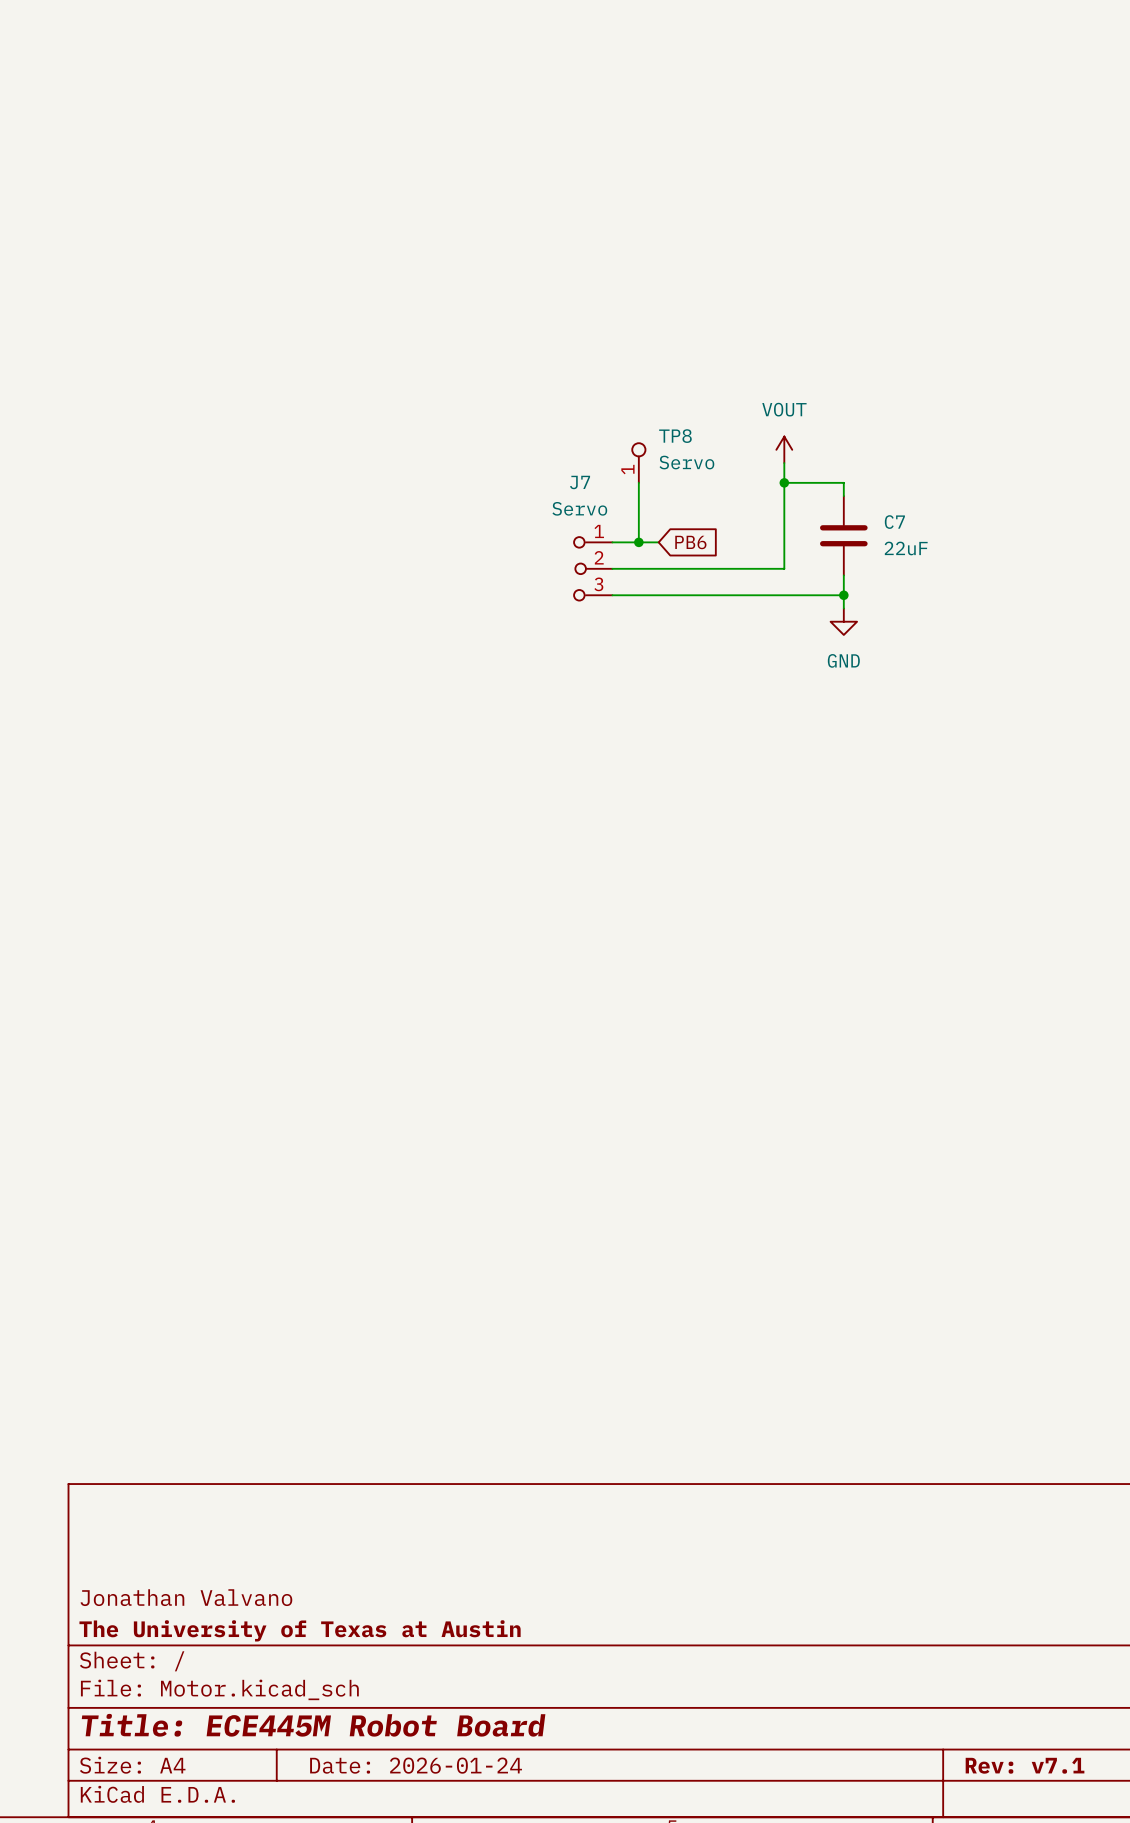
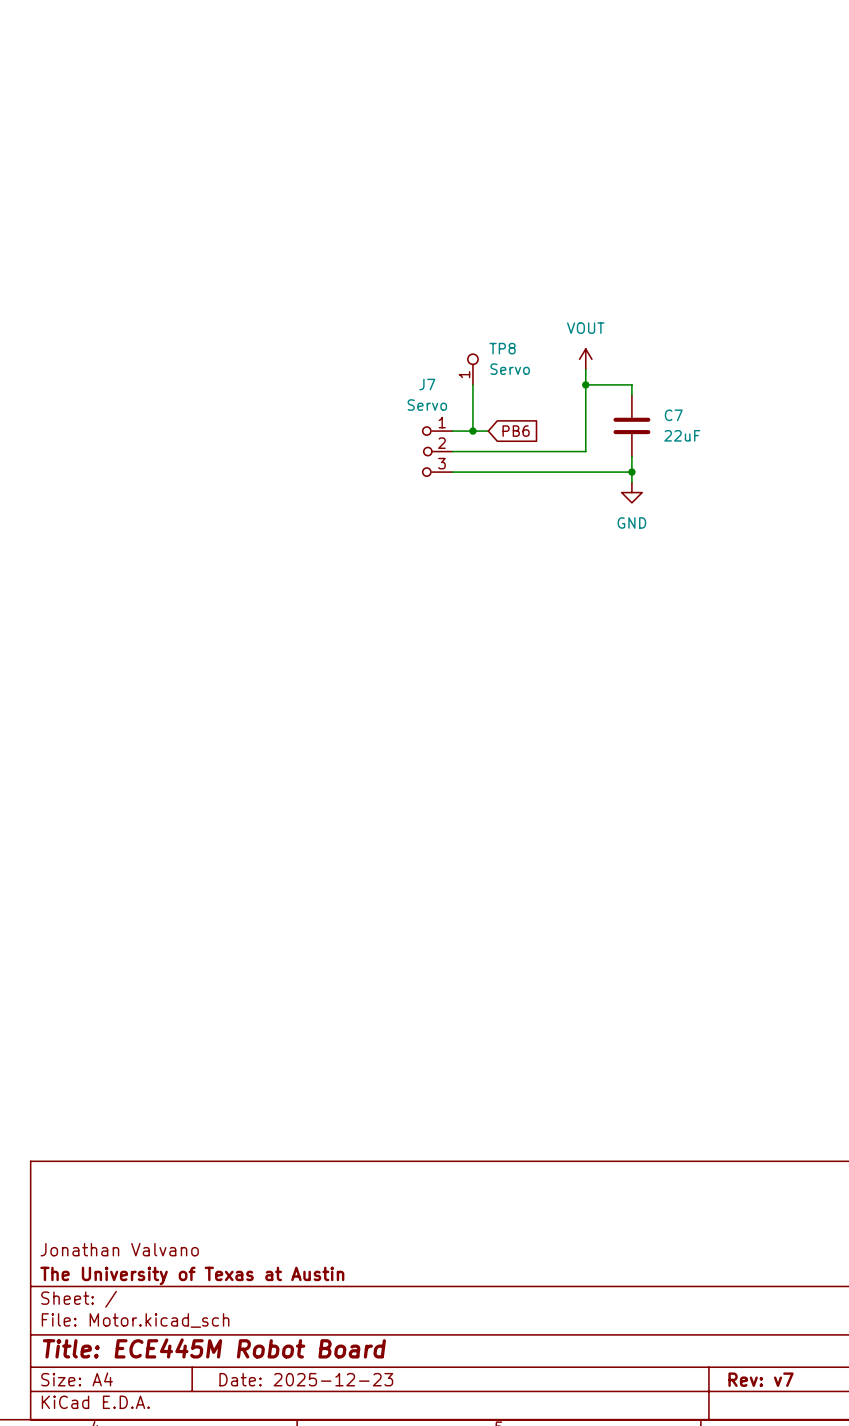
title block: Date: 2026-01-24 (416, 1765) -> Date: 2025-12-23 (306, 1379)
title block: Rev: v7.1 (1025, 1765) -> Rev: v7 (761, 1379)

